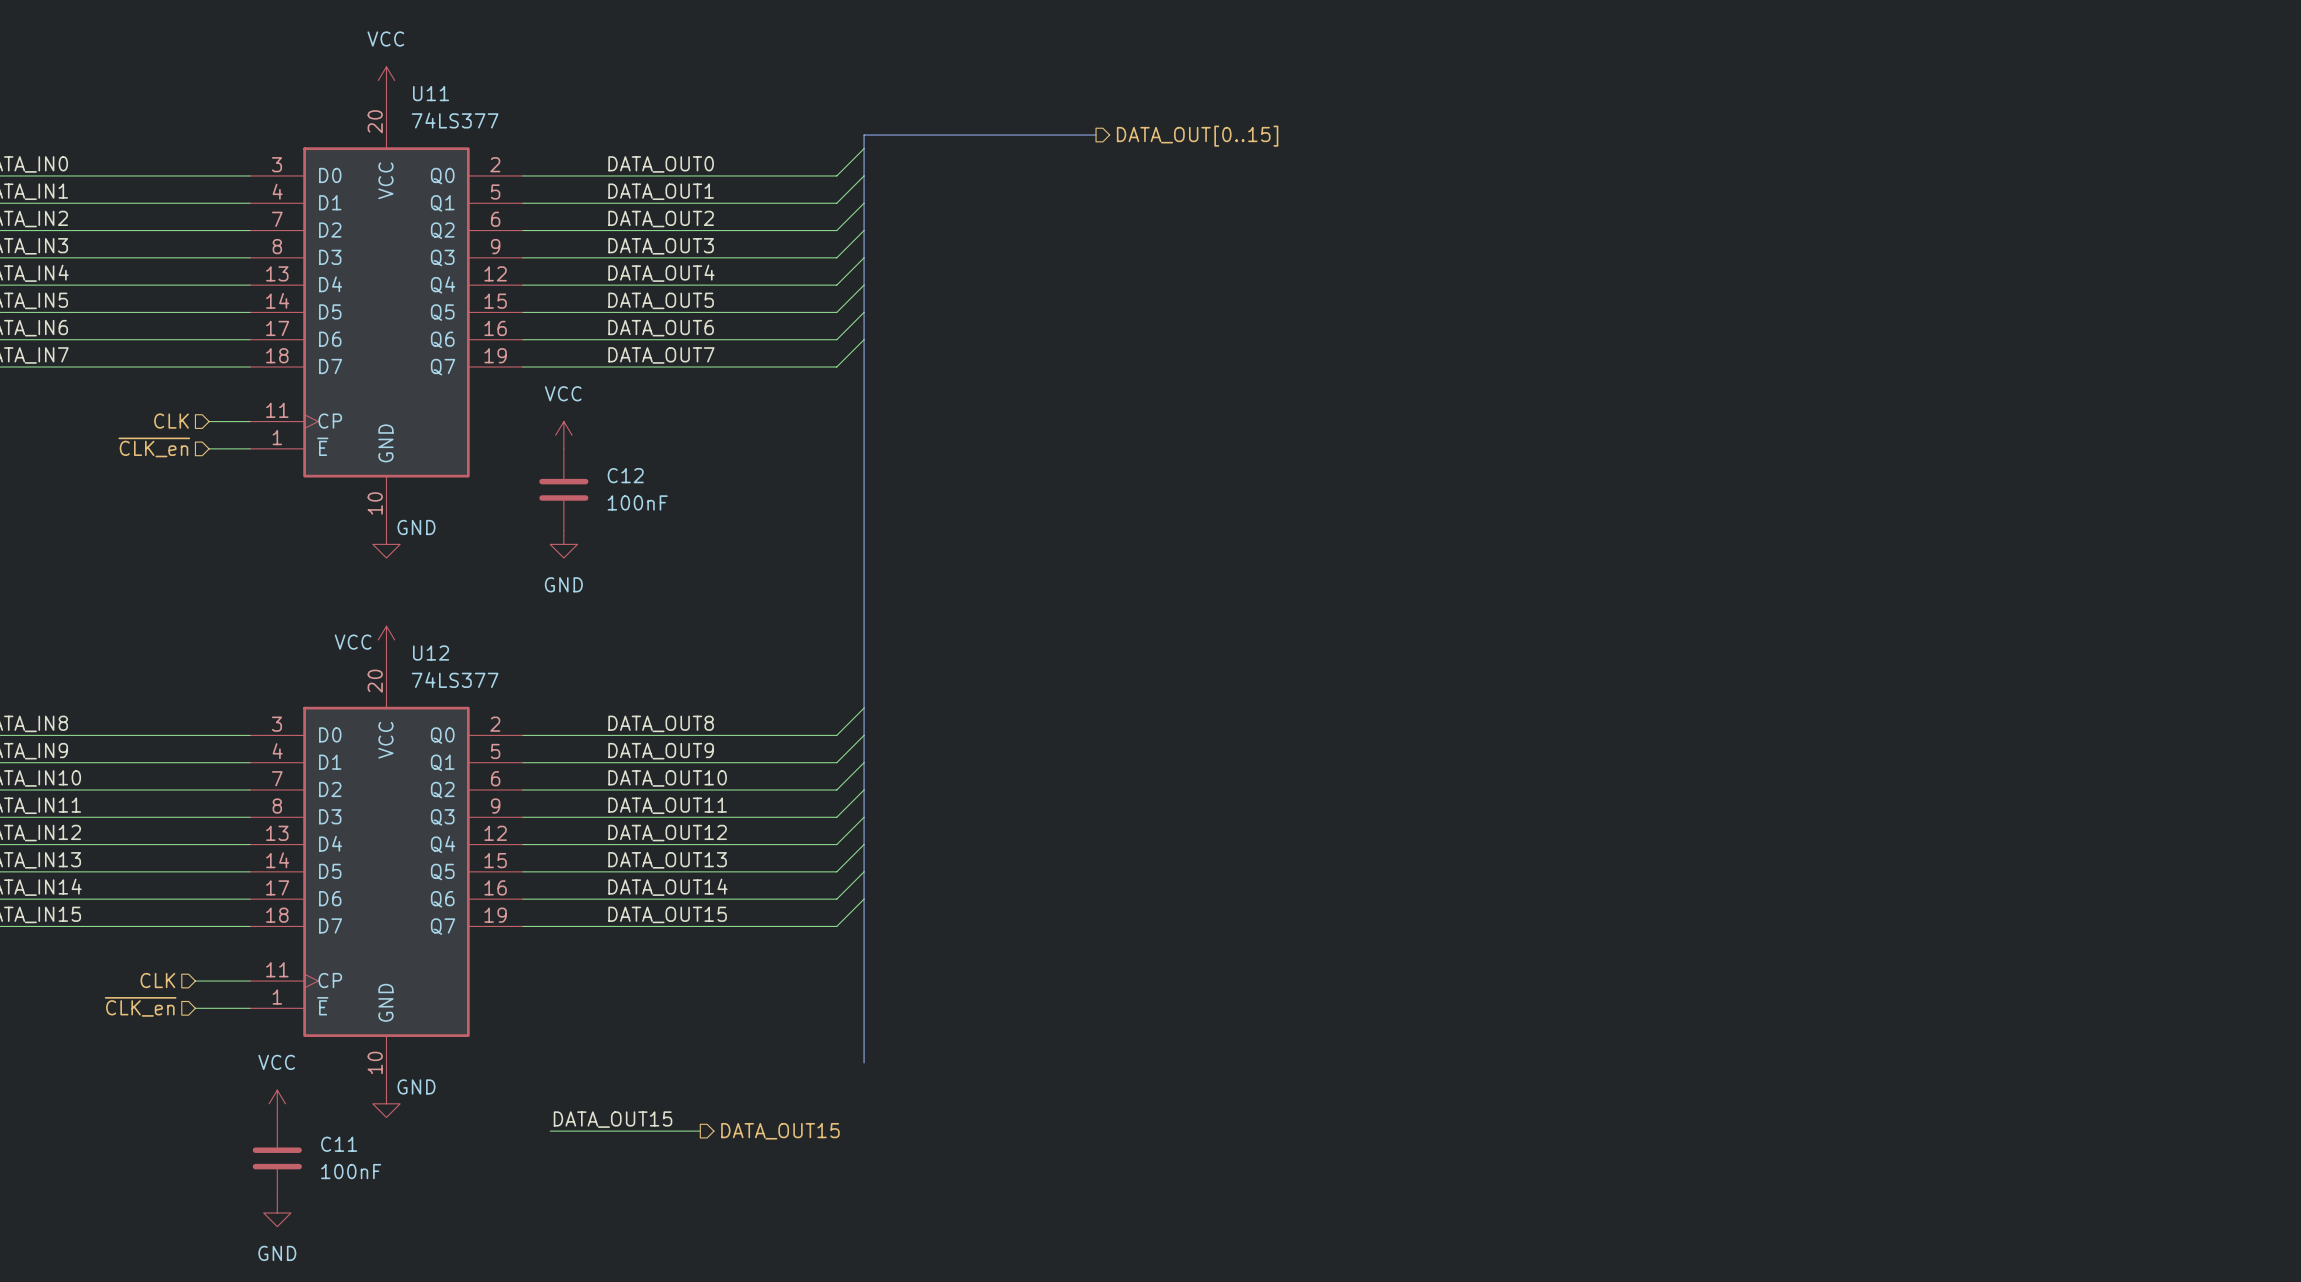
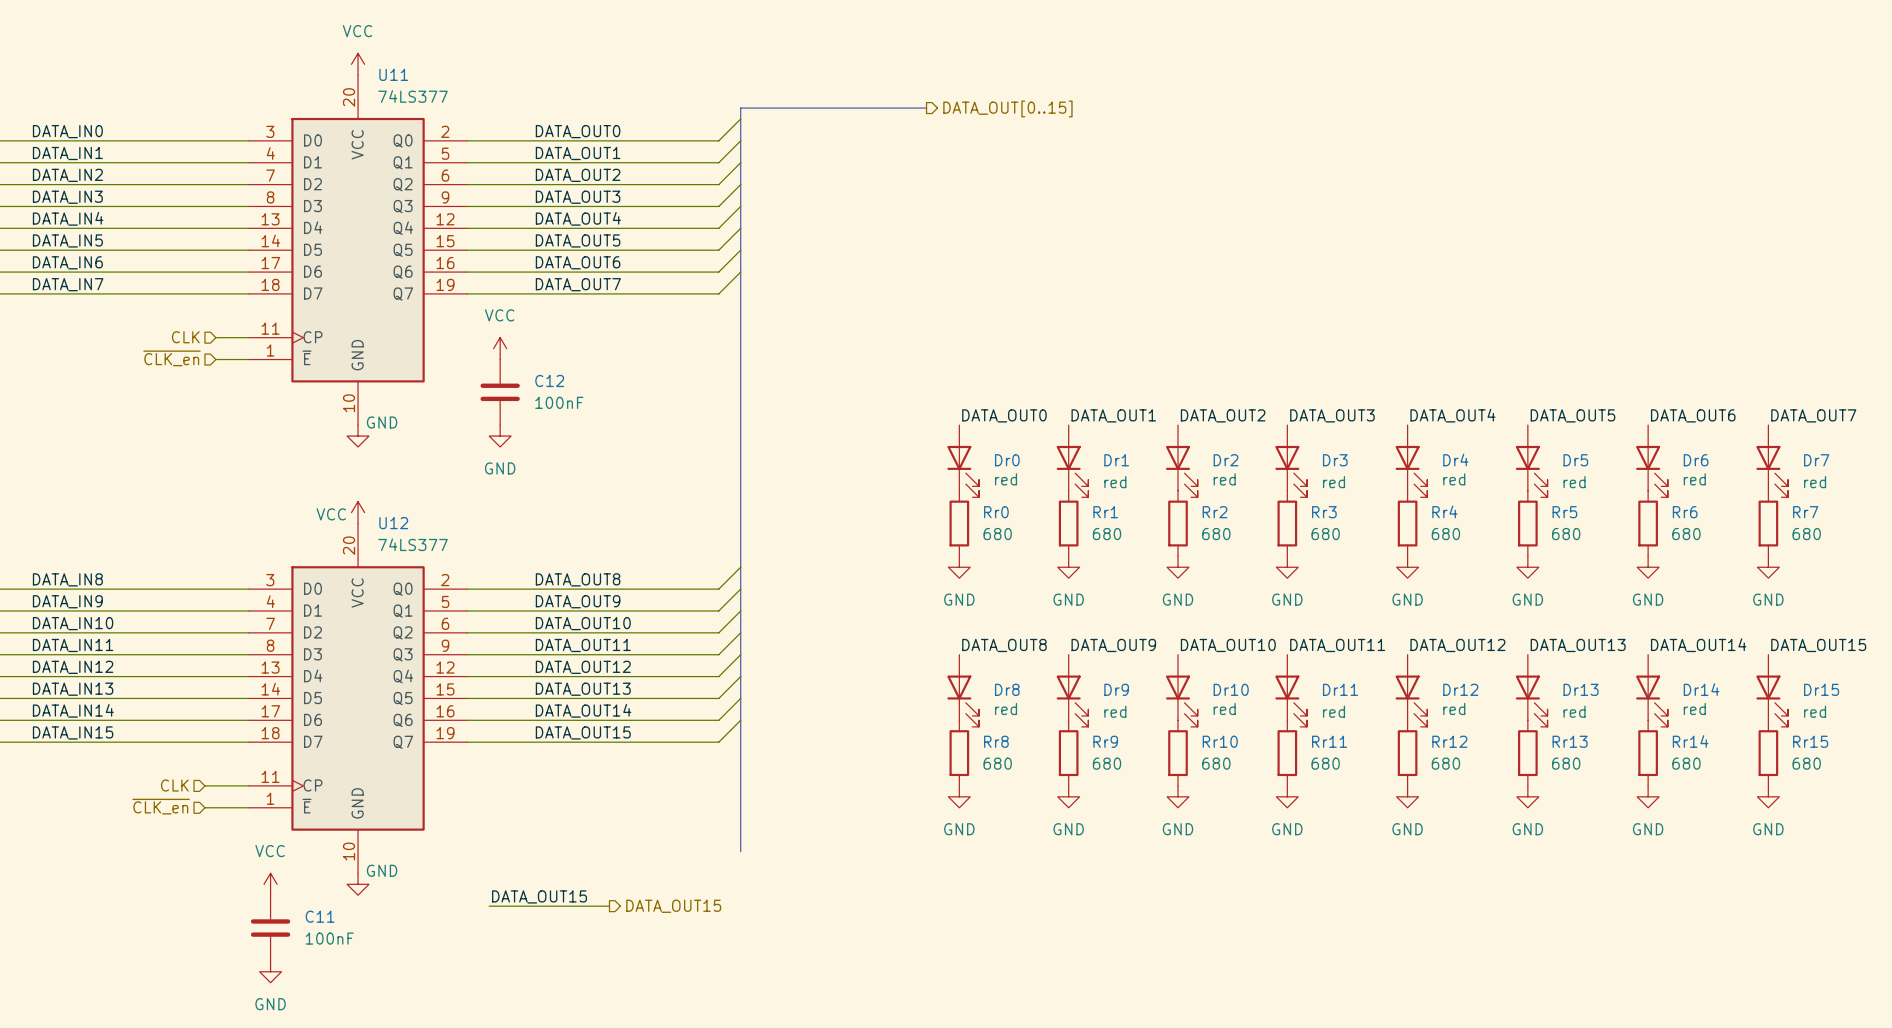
label: none -> DATA_OUT4 (1452, 415)
label: none -> DATA_OUT0 (1004, 415)
label: none -> DATA_OUT1 (1113, 415)
label: none -> DATA_OUT2 (1223, 415)
label: none -> DATA_OUT3 (1332, 415)
label: none -> DATA_OUT5 (1572, 415)
label: none -> DATA_OUT6 (1693, 415)
label: none -> DATA_OUT7 (1813, 415)
Dr0: none -> red (963, 461)
Dr1: none -> red (1072, 461)
Dr2: none -> red (1181, 461)
Dr3: none -> red (1291, 461)
Dr4: none -> red (1411, 461)
Dr5: none -> red (1531, 461)
Dr6: none -> red (1651, 461)
Dr7: none -> red (1772, 461)
Rr0: none -> 680 (959, 523)
Rr1: none -> 680 (1068, 523)
Rr2: none -> 680 (1178, 523)
Rr3: none -> 680 (1287, 523)
Rr4: none -> 680 (1407, 523)
Rr5: none -> 680 (1527, 523)
Rr6: none -> 680 (1648, 523)
Rr7: none -> 680 (1768, 523)
power symbol: none -> GND (959, 567)
power symbol: none -> GND (1068, 567)
power symbol: none -> GND (1178, 567)
power symbol: none -> GND (1287, 567)
power symbol: none -> GND (1407, 567)
power symbol: none -> GND (1527, 567)
power symbol: none -> GND (1648, 567)
power symbol: none -> GND (1768, 567)
label: none -> DATA_OUT8 (1004, 645)
label: none -> DATA_OUT9 (1113, 645)
label: none -> DATA_OUT10 (1228, 645)
label: none -> DATA_OUT11 (1337, 645)
label: none -> DATA_OUT12 (1457, 645)
label: none -> DATA_OUT13 (1578, 645)
label: none -> DATA_OUT14 (1698, 645)
label: none -> DATA_OUT15 (1818, 645)
Dr8: none -> red (963, 690)
Dr9: none -> red (1072, 690)
Dr10: none -> red (1181, 690)
Dr11: none -> red (1291, 690)
Dr12: none -> red (1411, 690)
Dr13: none -> red (1531, 690)
Dr14: none -> red (1651, 690)
Dr15: none -> red (1772, 690)
Rr8: none -> 680 (959, 753)
Rr9: none -> 680 (1068, 753)
Rr10: none -> 680 (1178, 753)
Rr11: none -> 680 (1287, 753)
Rr12: none -> 680 (1407, 753)
Rr13: none -> 680 (1527, 753)
Rr14: none -> 680 (1648, 753)
Rr15: none -> 680 (1768, 753)
power symbol: none -> GND (959, 796)
power symbol: none -> GND (1068, 796)
power symbol: none -> GND (1178, 796)
power symbol: none -> GND (1287, 796)
power symbol: none -> GND (1407, 796)
power symbol: none -> GND (1527, 796)
power symbol: none -> GND (1648, 796)
power symbol: none -> GND (1768, 796)

